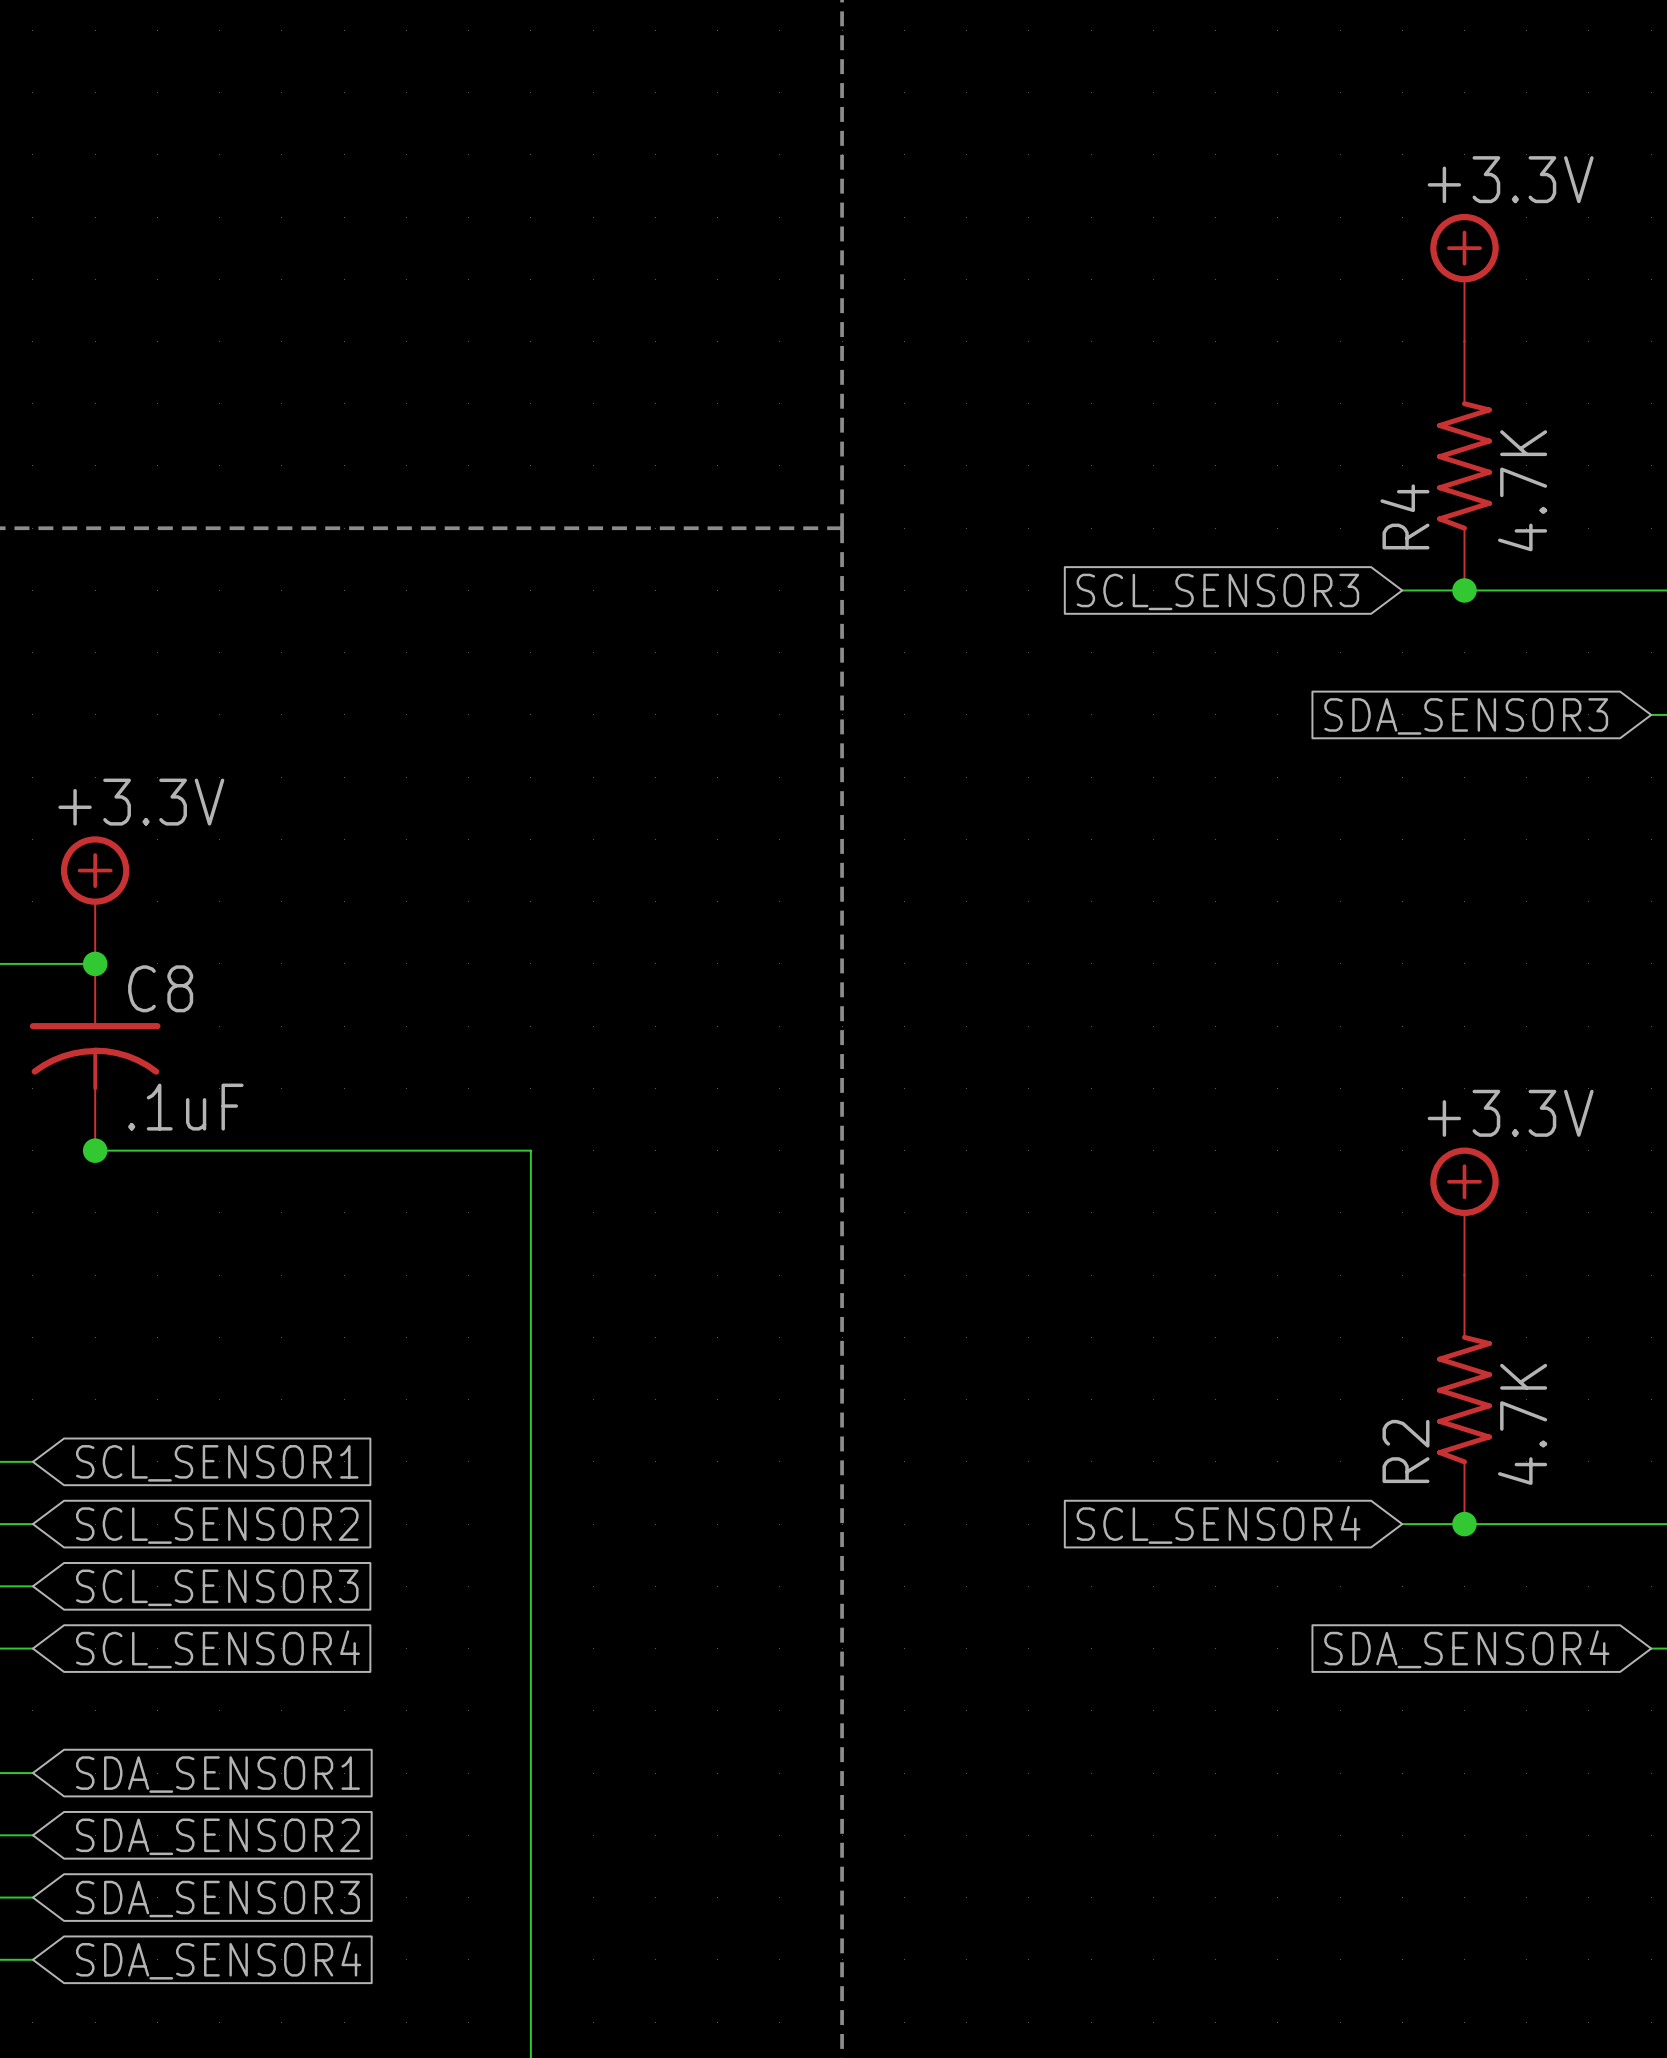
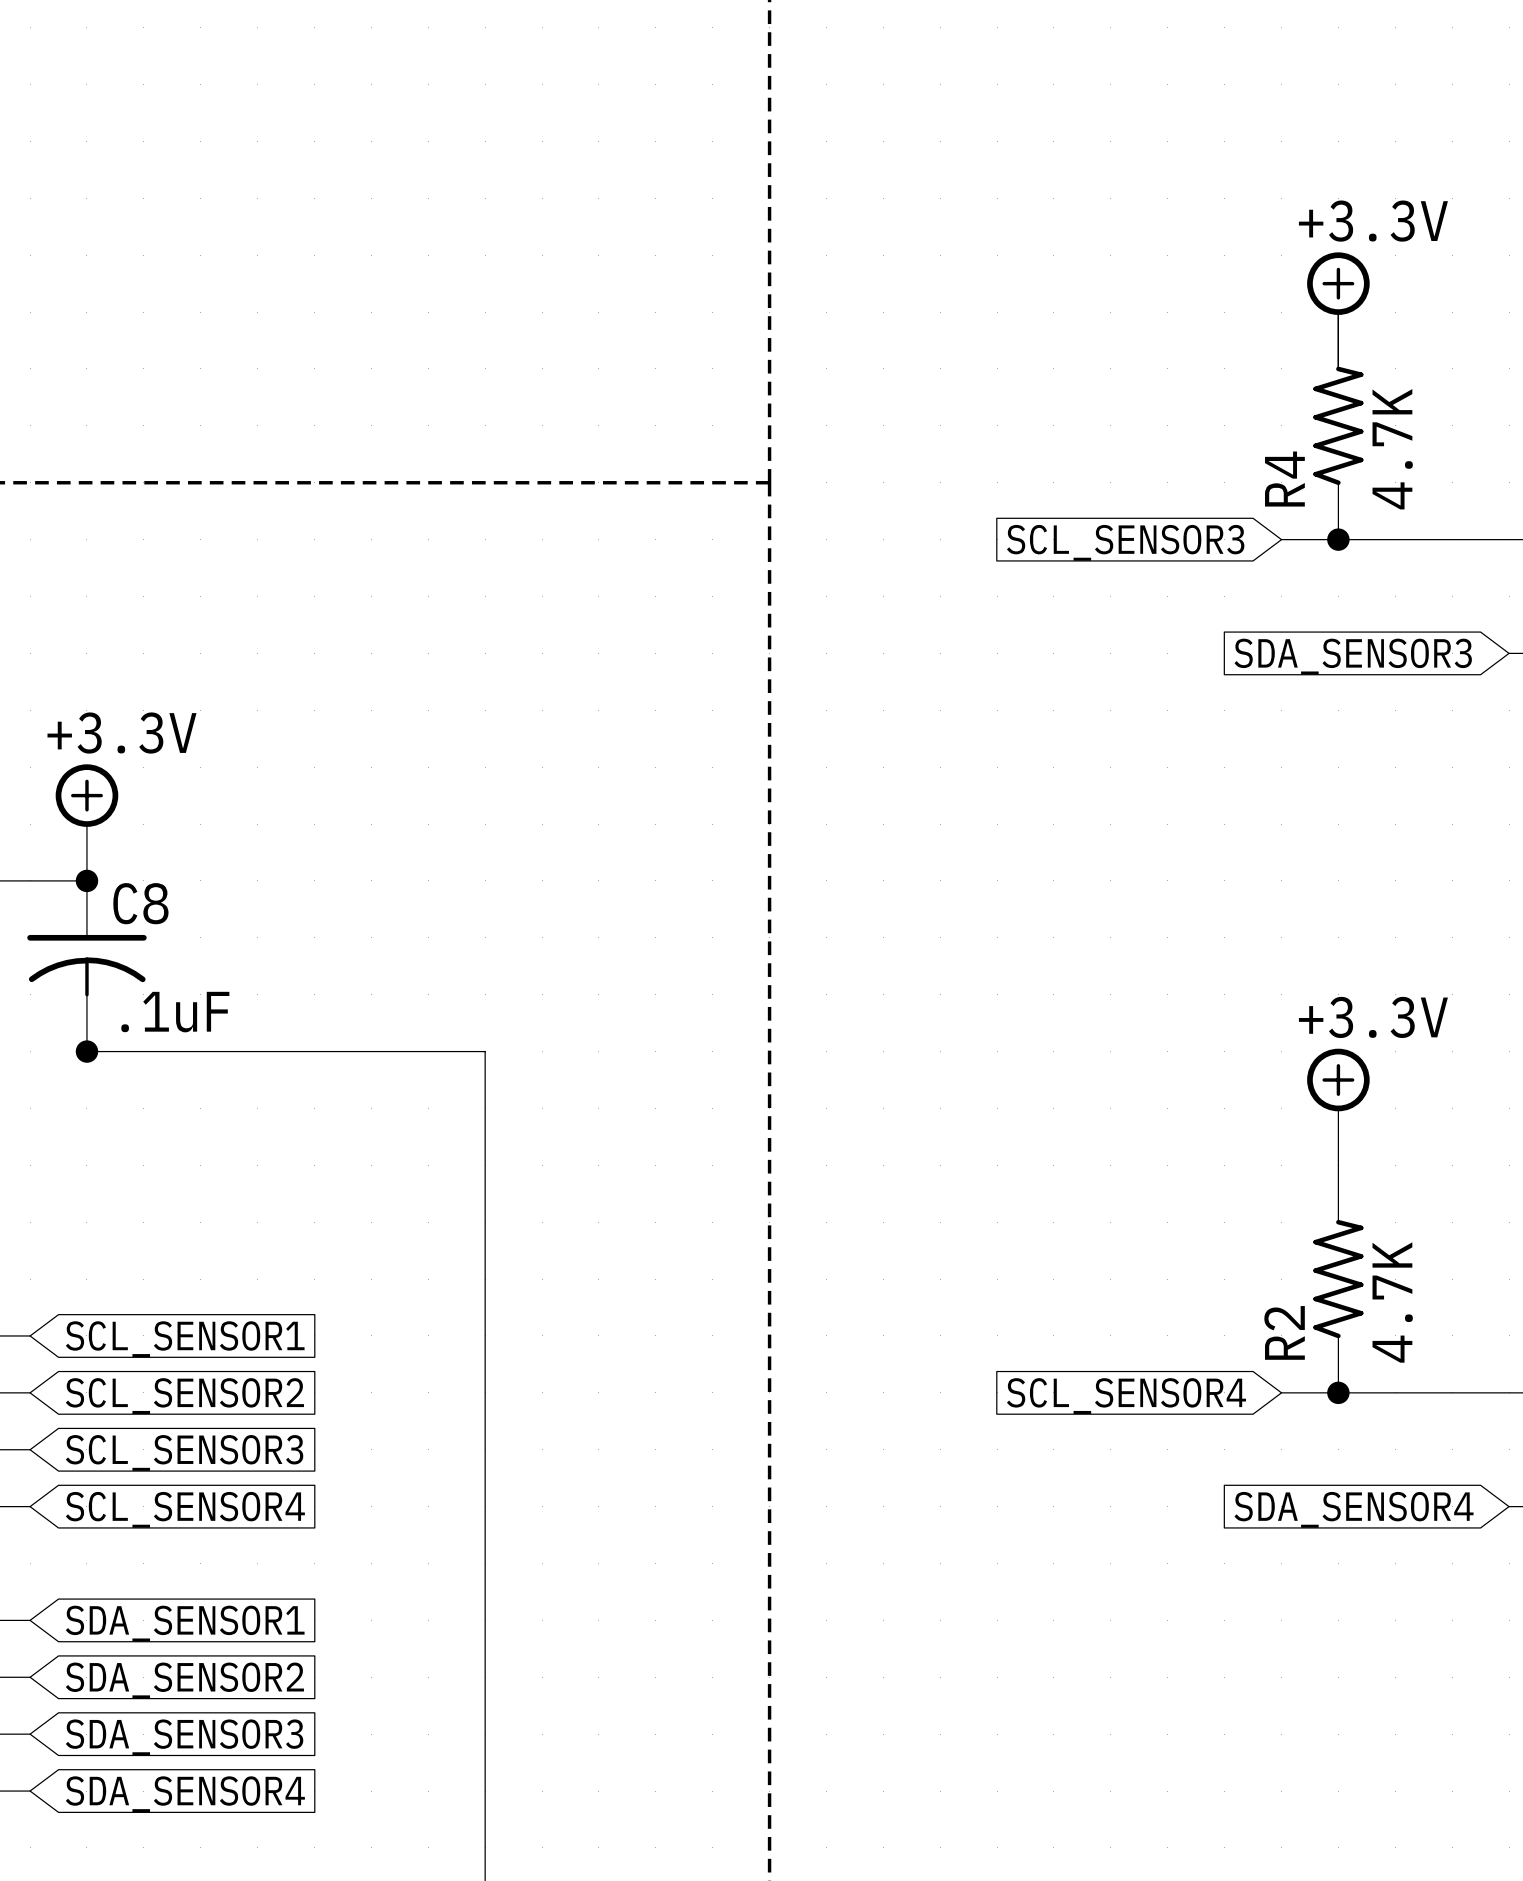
power symbol position: +3.3V (1464, 277) -> +3.3V (1338, 310)

